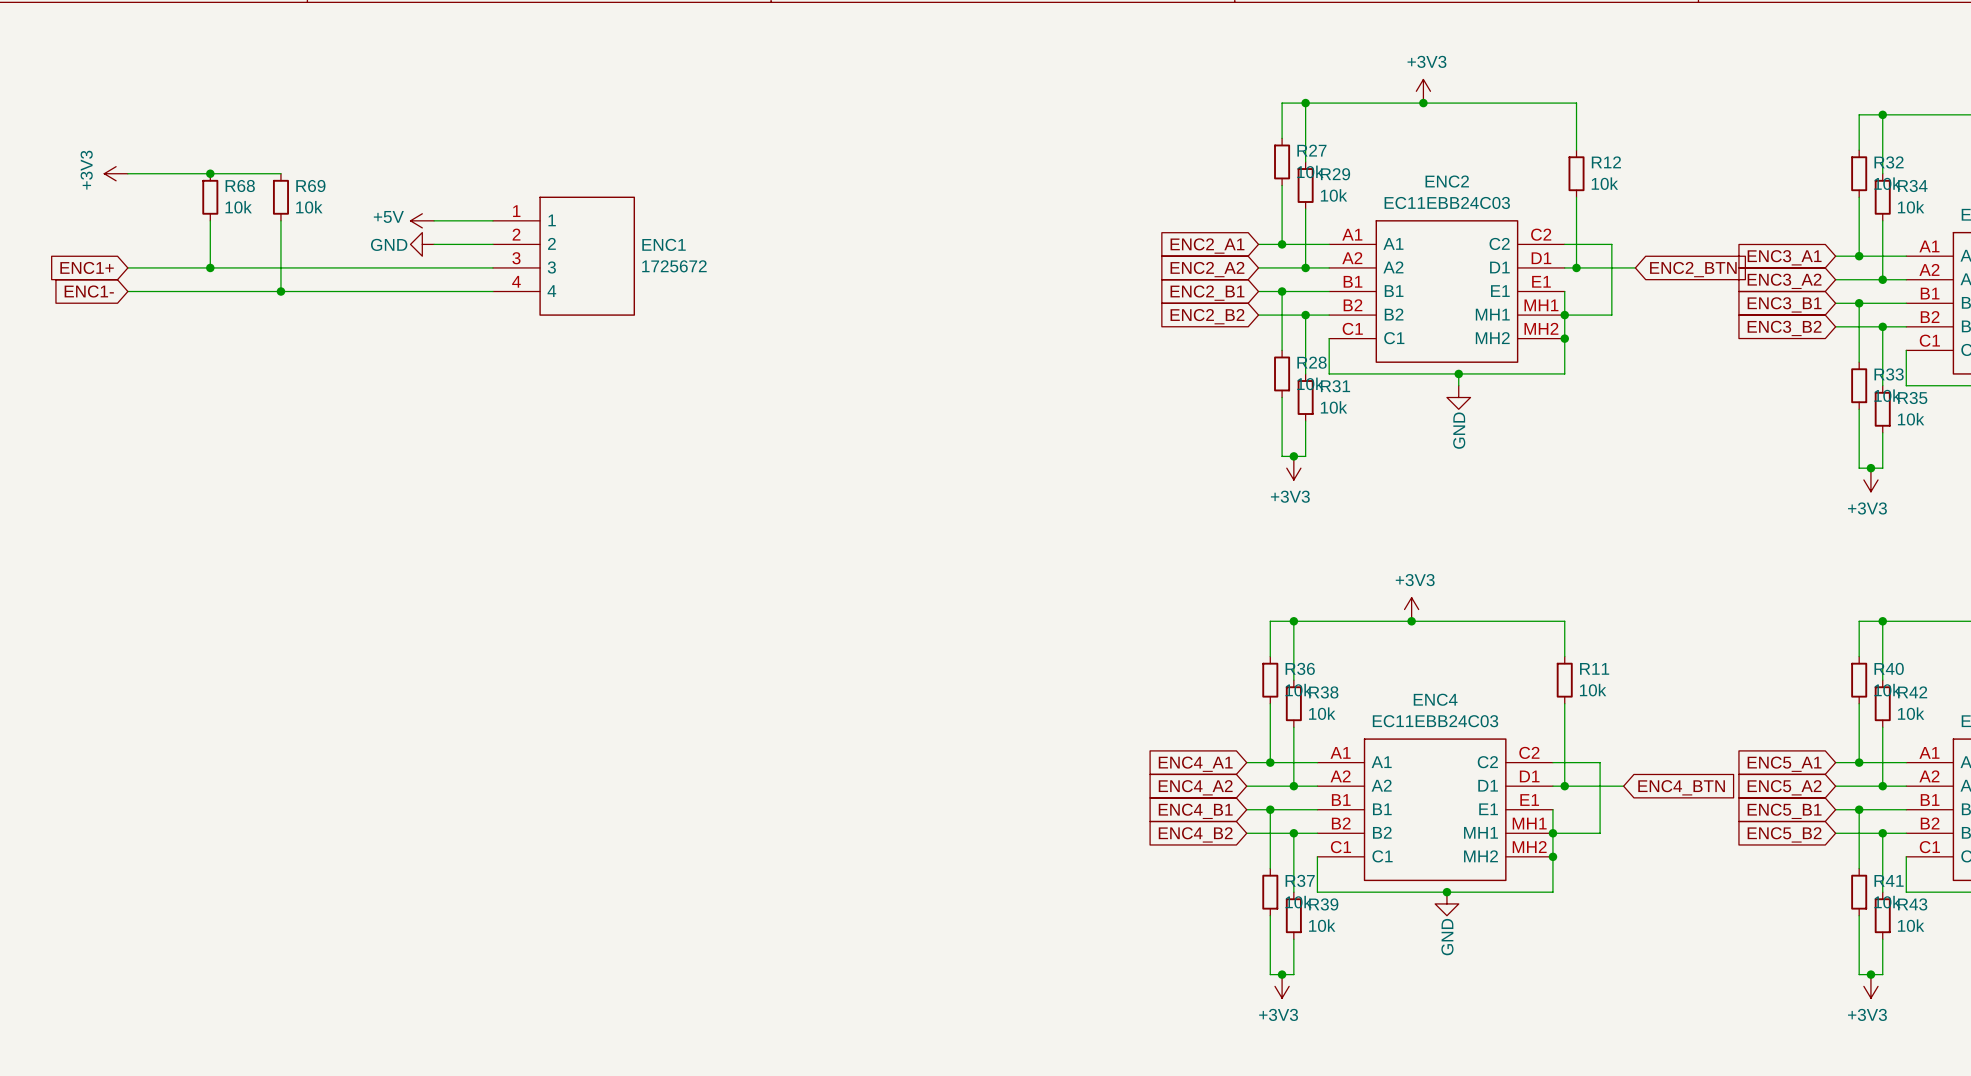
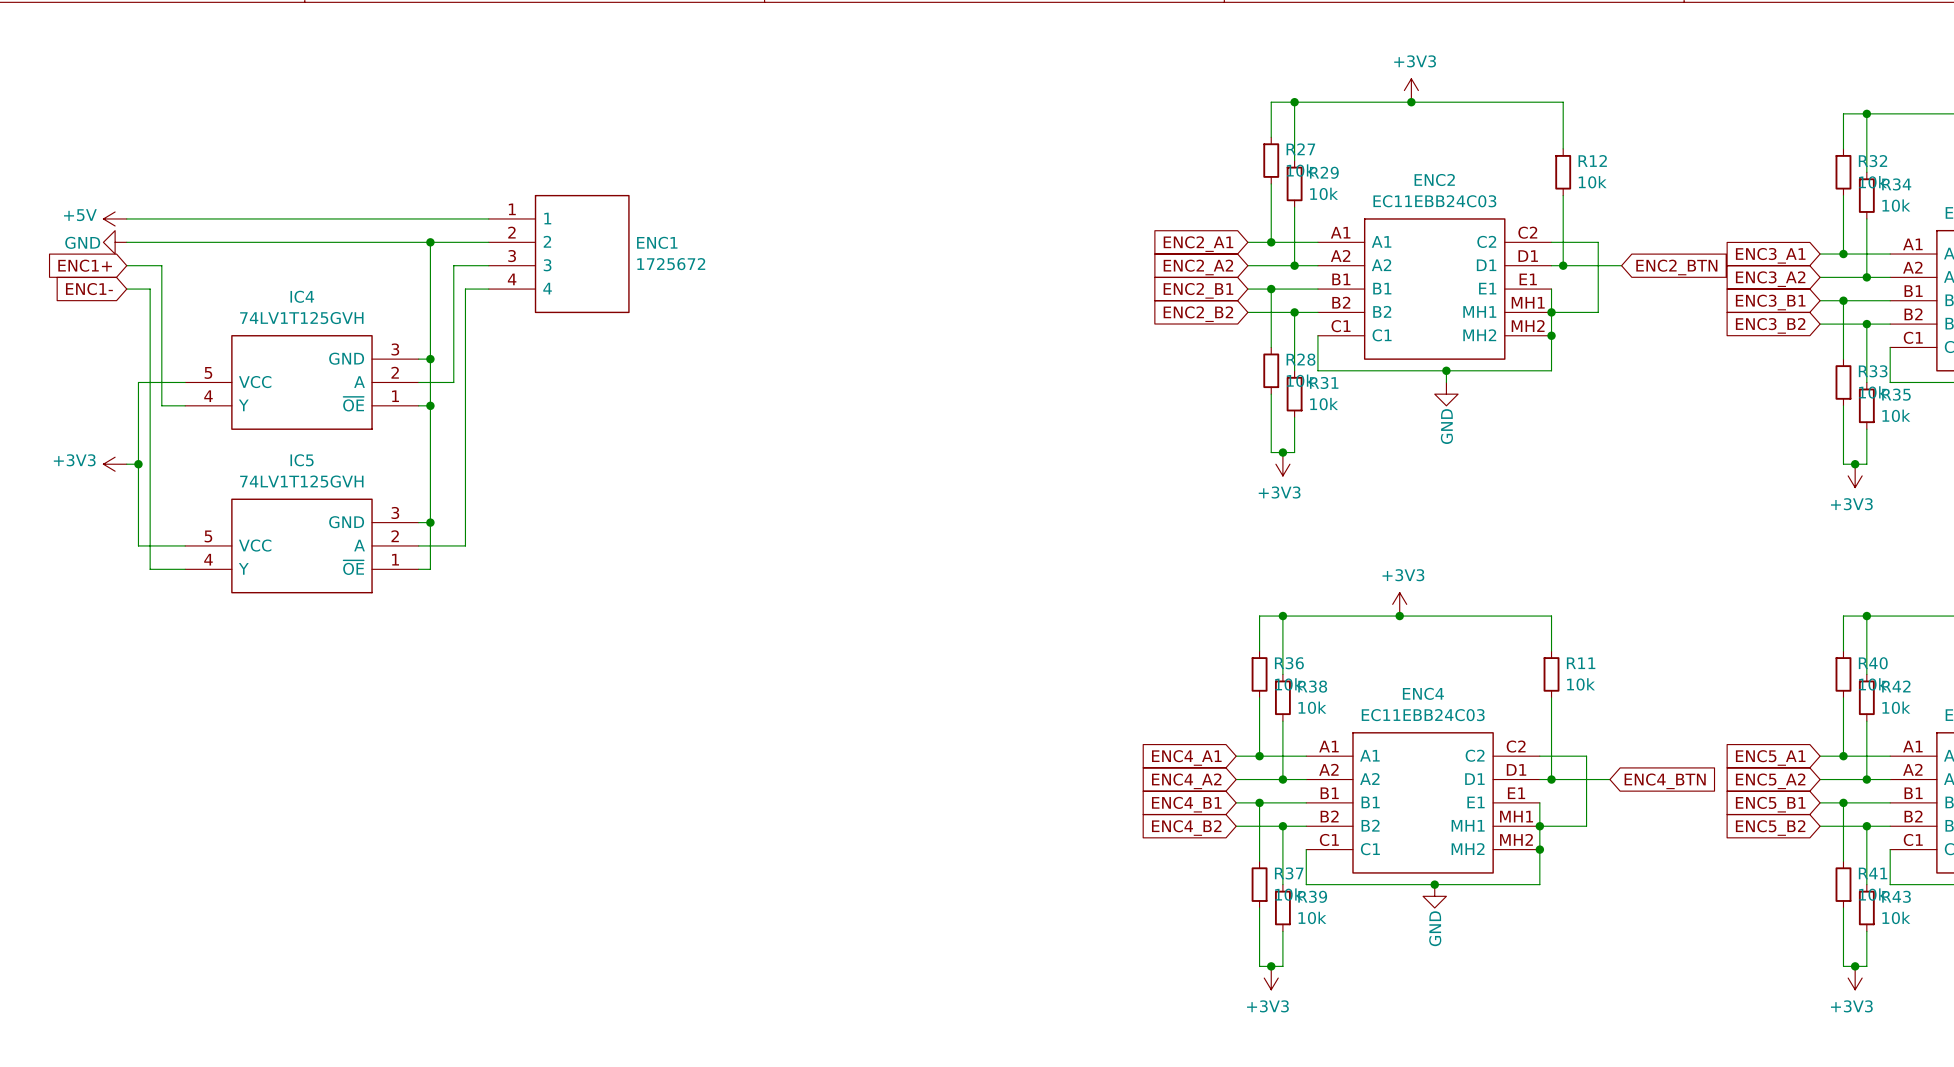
power symbol: +3V3 (116, 173) -> none
wire: (127, 173) (280, 173) -> none
junction: (210, 173) -> none
R68: 10k (210, 197) -> none
R69: 10k (280, 197) -> none
power symbol: none -> +5V (115, 218)
wire: none -> (126, 218) (430, 218)
wire: (210, 220) (210, 267) -> none
wire: (280, 220) (280, 291) -> none
power symbol: +5V (422, 220) -> none
power symbol: none -> GND (115, 242)
wire: none -> (126, 242) (430, 242) (430, 569) (418, 569)
power symbol: GND (422, 244) -> none
junction: none -> (430, 242)
wire: (163, 267) (457, 267) -> (418, 382) (453, 382) (453, 265)
wire: none -> (161, 265) (161, 405) (185, 405)
junction: (210, 267) -> none
wire: (151, 291) (469, 291) -> (418, 545) (465, 545) (465, 289)
wire: none -> (150, 289) (150, 569) (185, 569)
junction: (280, 291) -> none
wire: none -> (418, 359) (430, 359)
junction: none -> (430, 359)
wire: none -> (185, 382) (138, 382) (138, 545) (185, 545)
IC4: none -> 74LV1T125GVH (301, 382)
wire: none -> (418, 405) (430, 405)
junction: none -> (430, 405)
power symbol: none -> +3V3 (115, 464)
wire: none -> (126, 464) (138, 464)
junction: none -> (138, 464)
wire: none -> (418, 522) (430, 522)
junction: none -> (430, 522)
IC5: none -> 74LV1T125GVH (301, 545)

